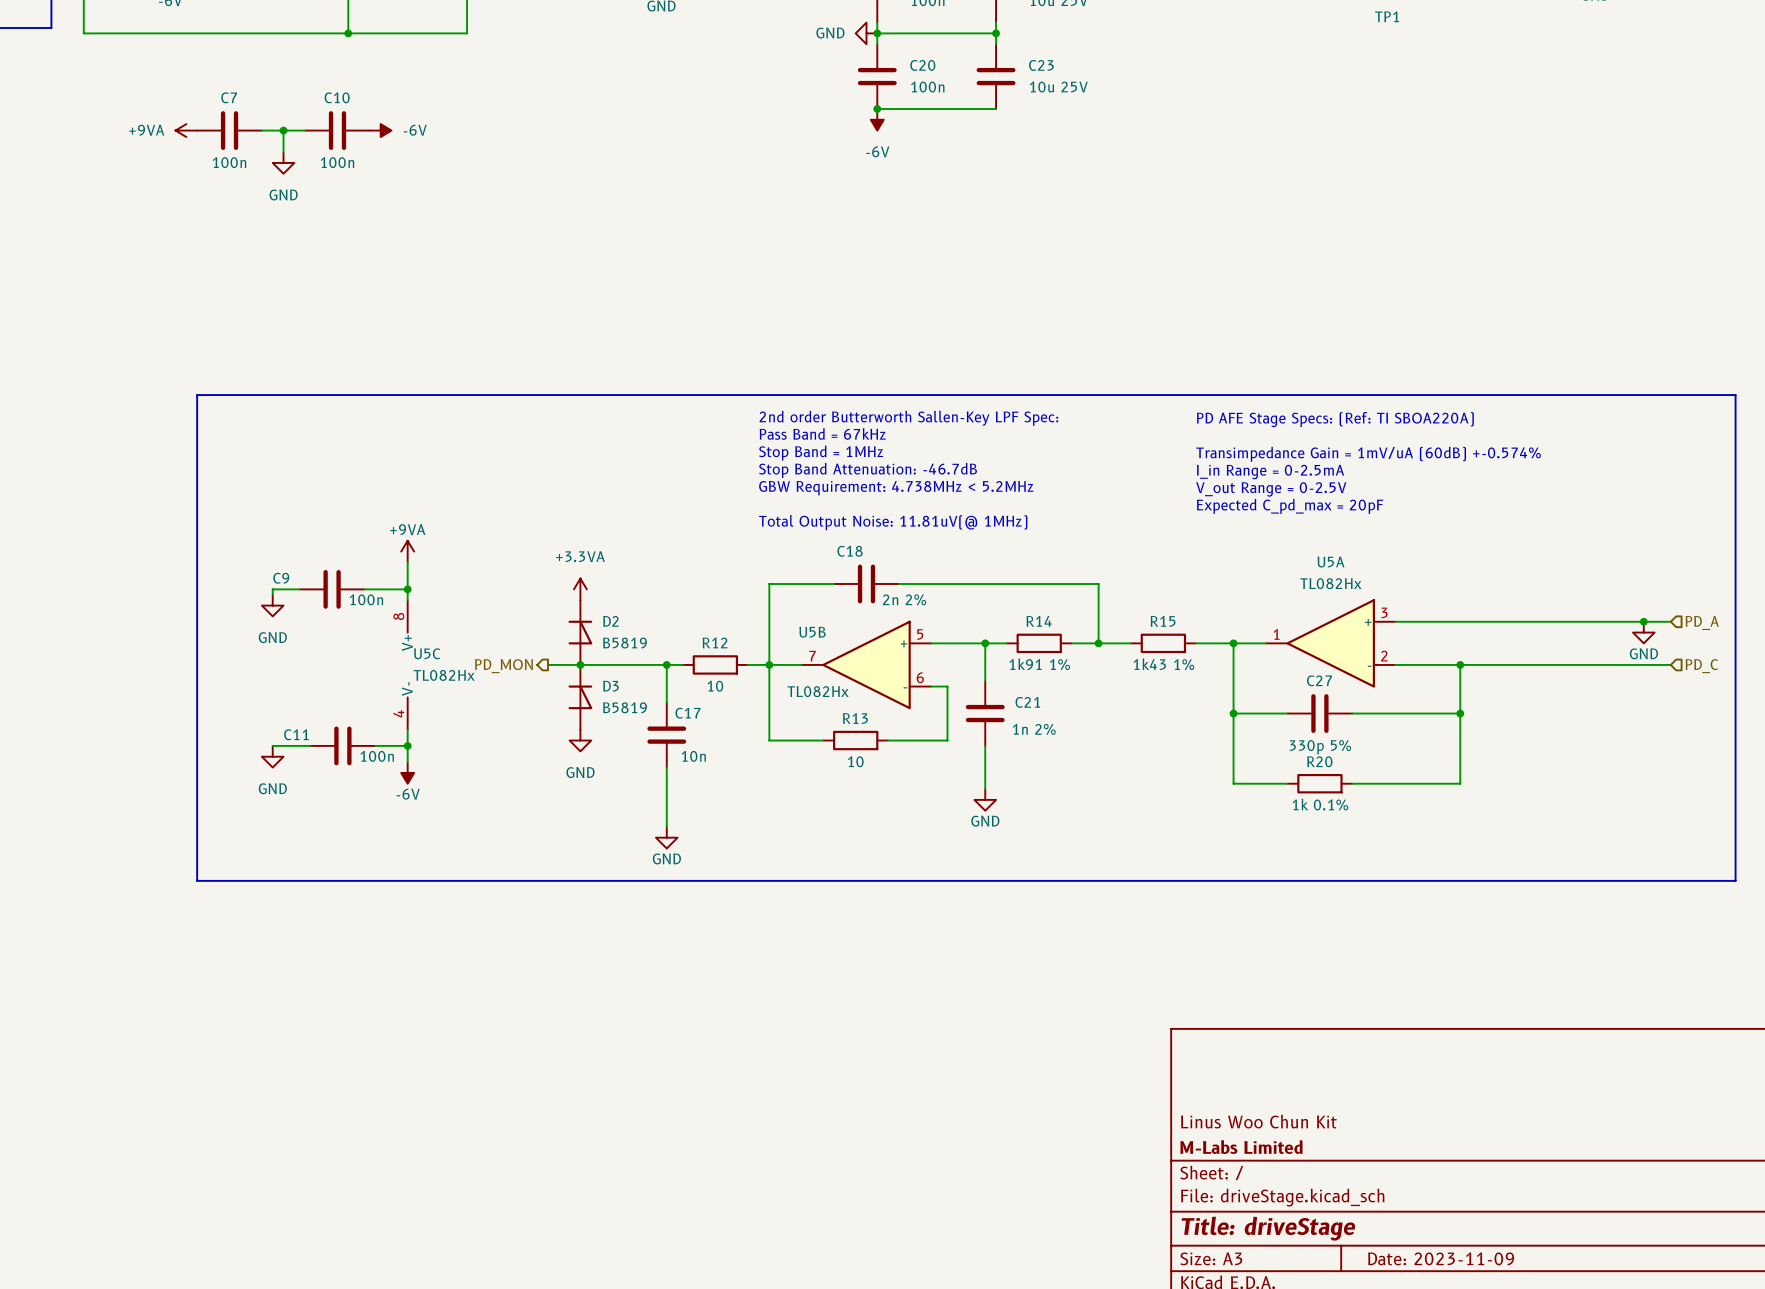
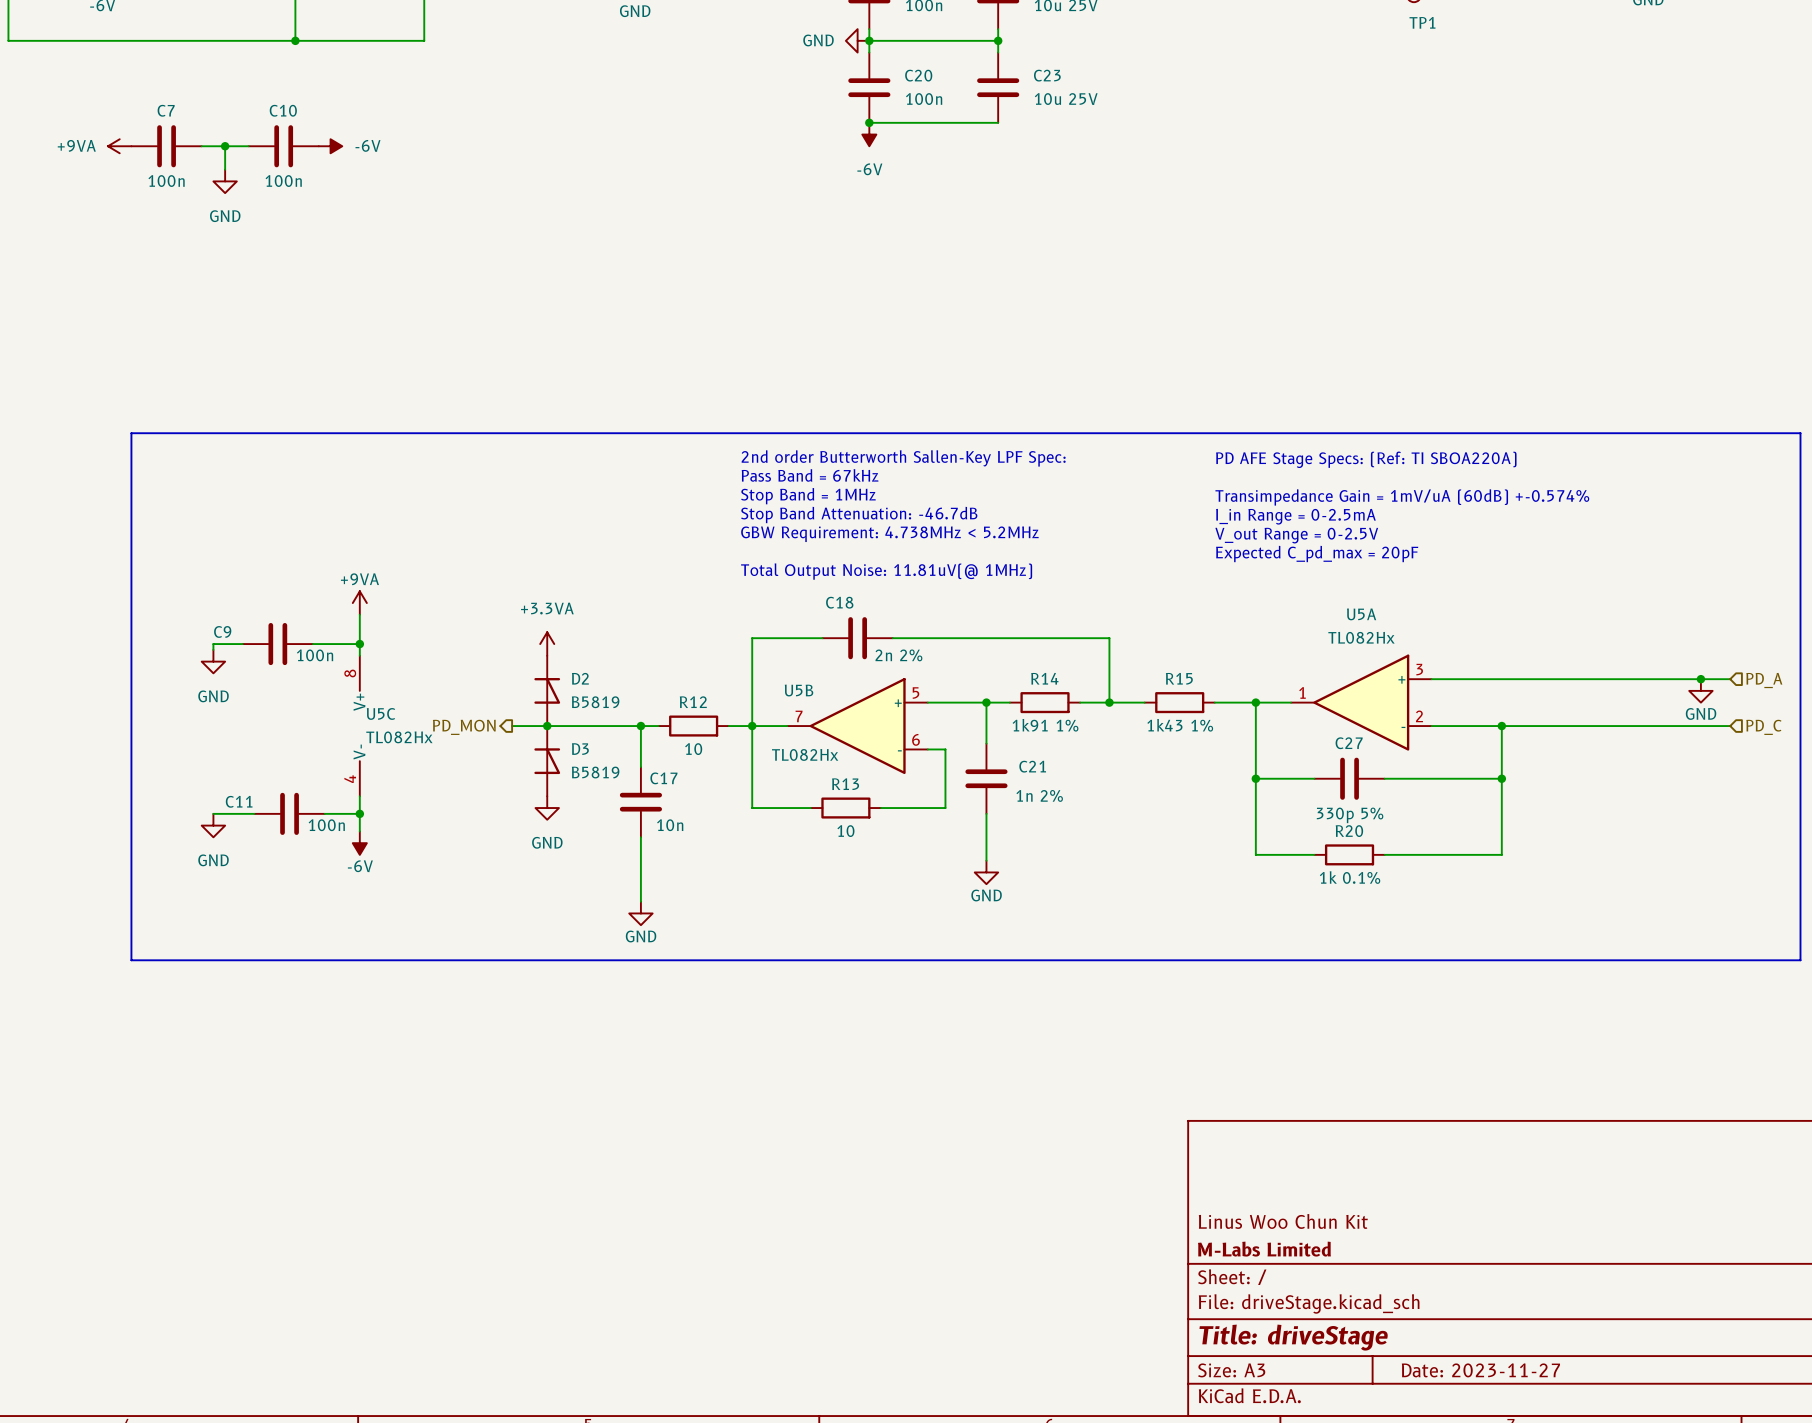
title block: Date: 2023-11-09 (1441, 1258) -> Date: 2023-11-27 (1480, 1370)

